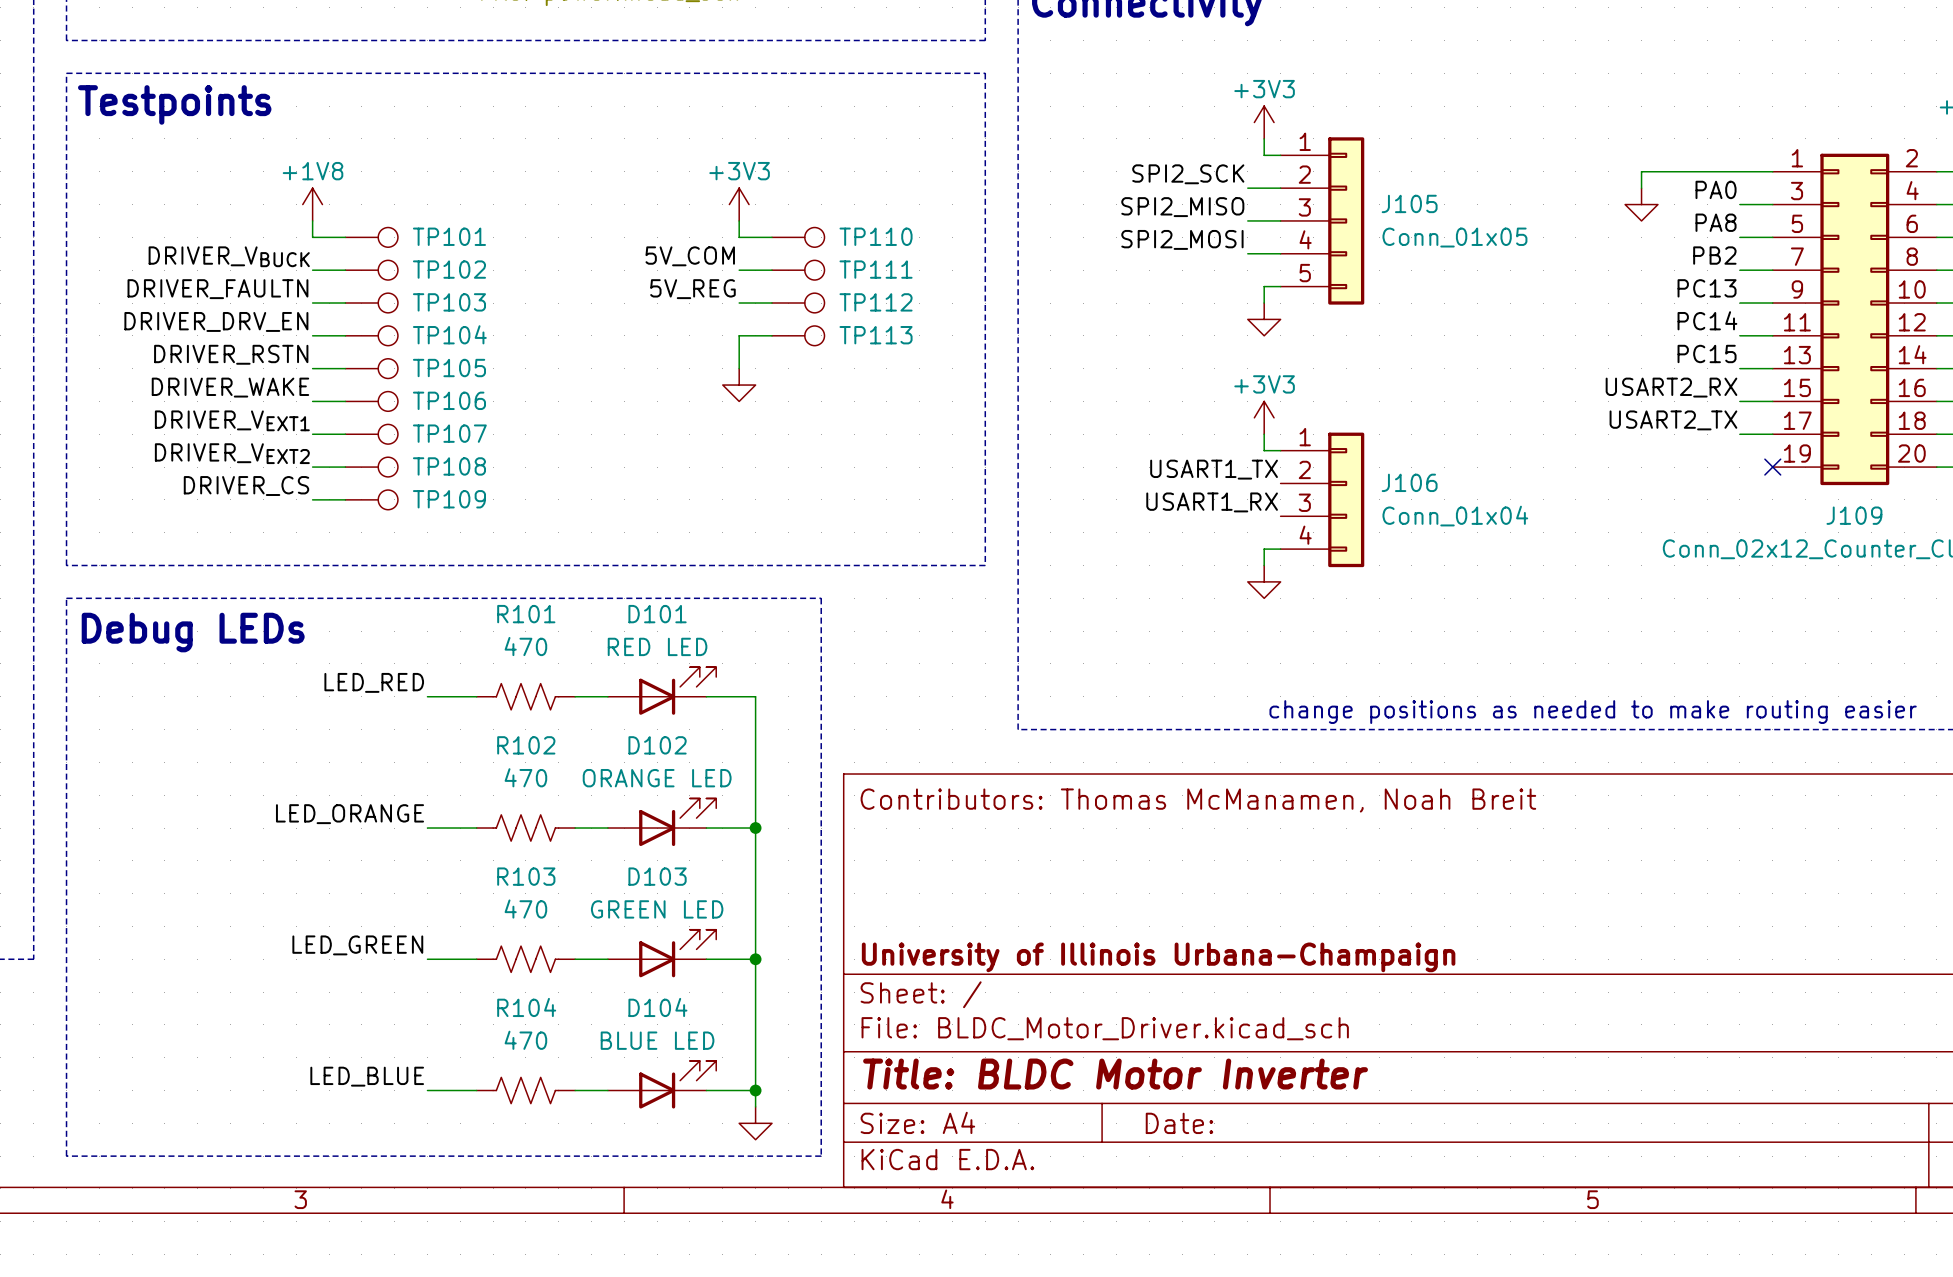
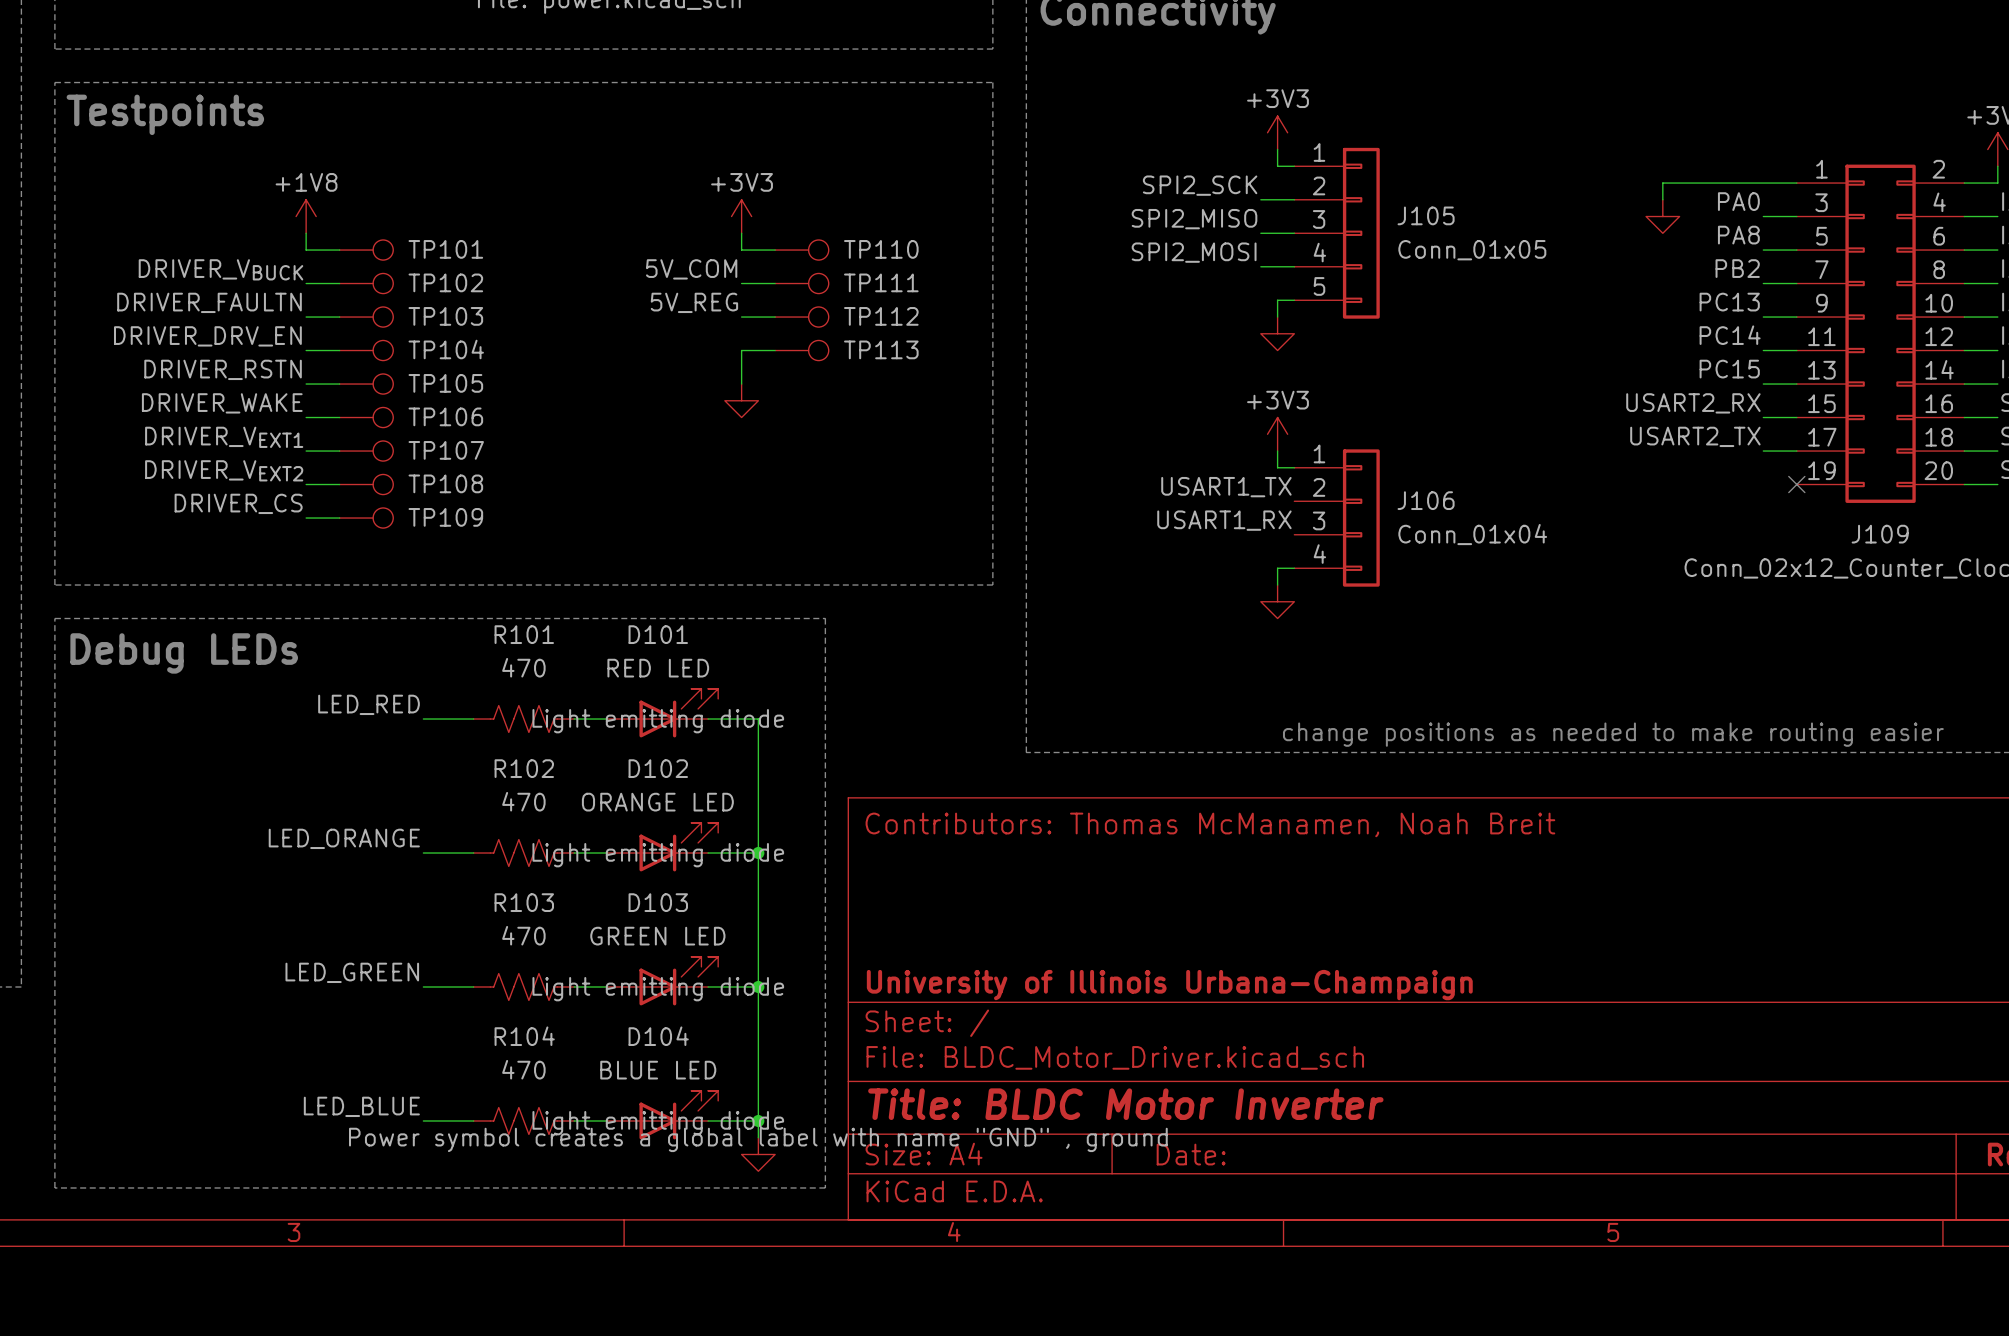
D101 text: none -> Light emitting diode (658, 721)
D102 text: none -> Light emitting diode (658, 855)
D103 text: none -> Light emitting diode (658, 989)
D104 text: none -> Light emitting diode (658, 1123)
power symbol text: none -> Power symbol creates a global label with name "GND" , ground (758, 1139)

